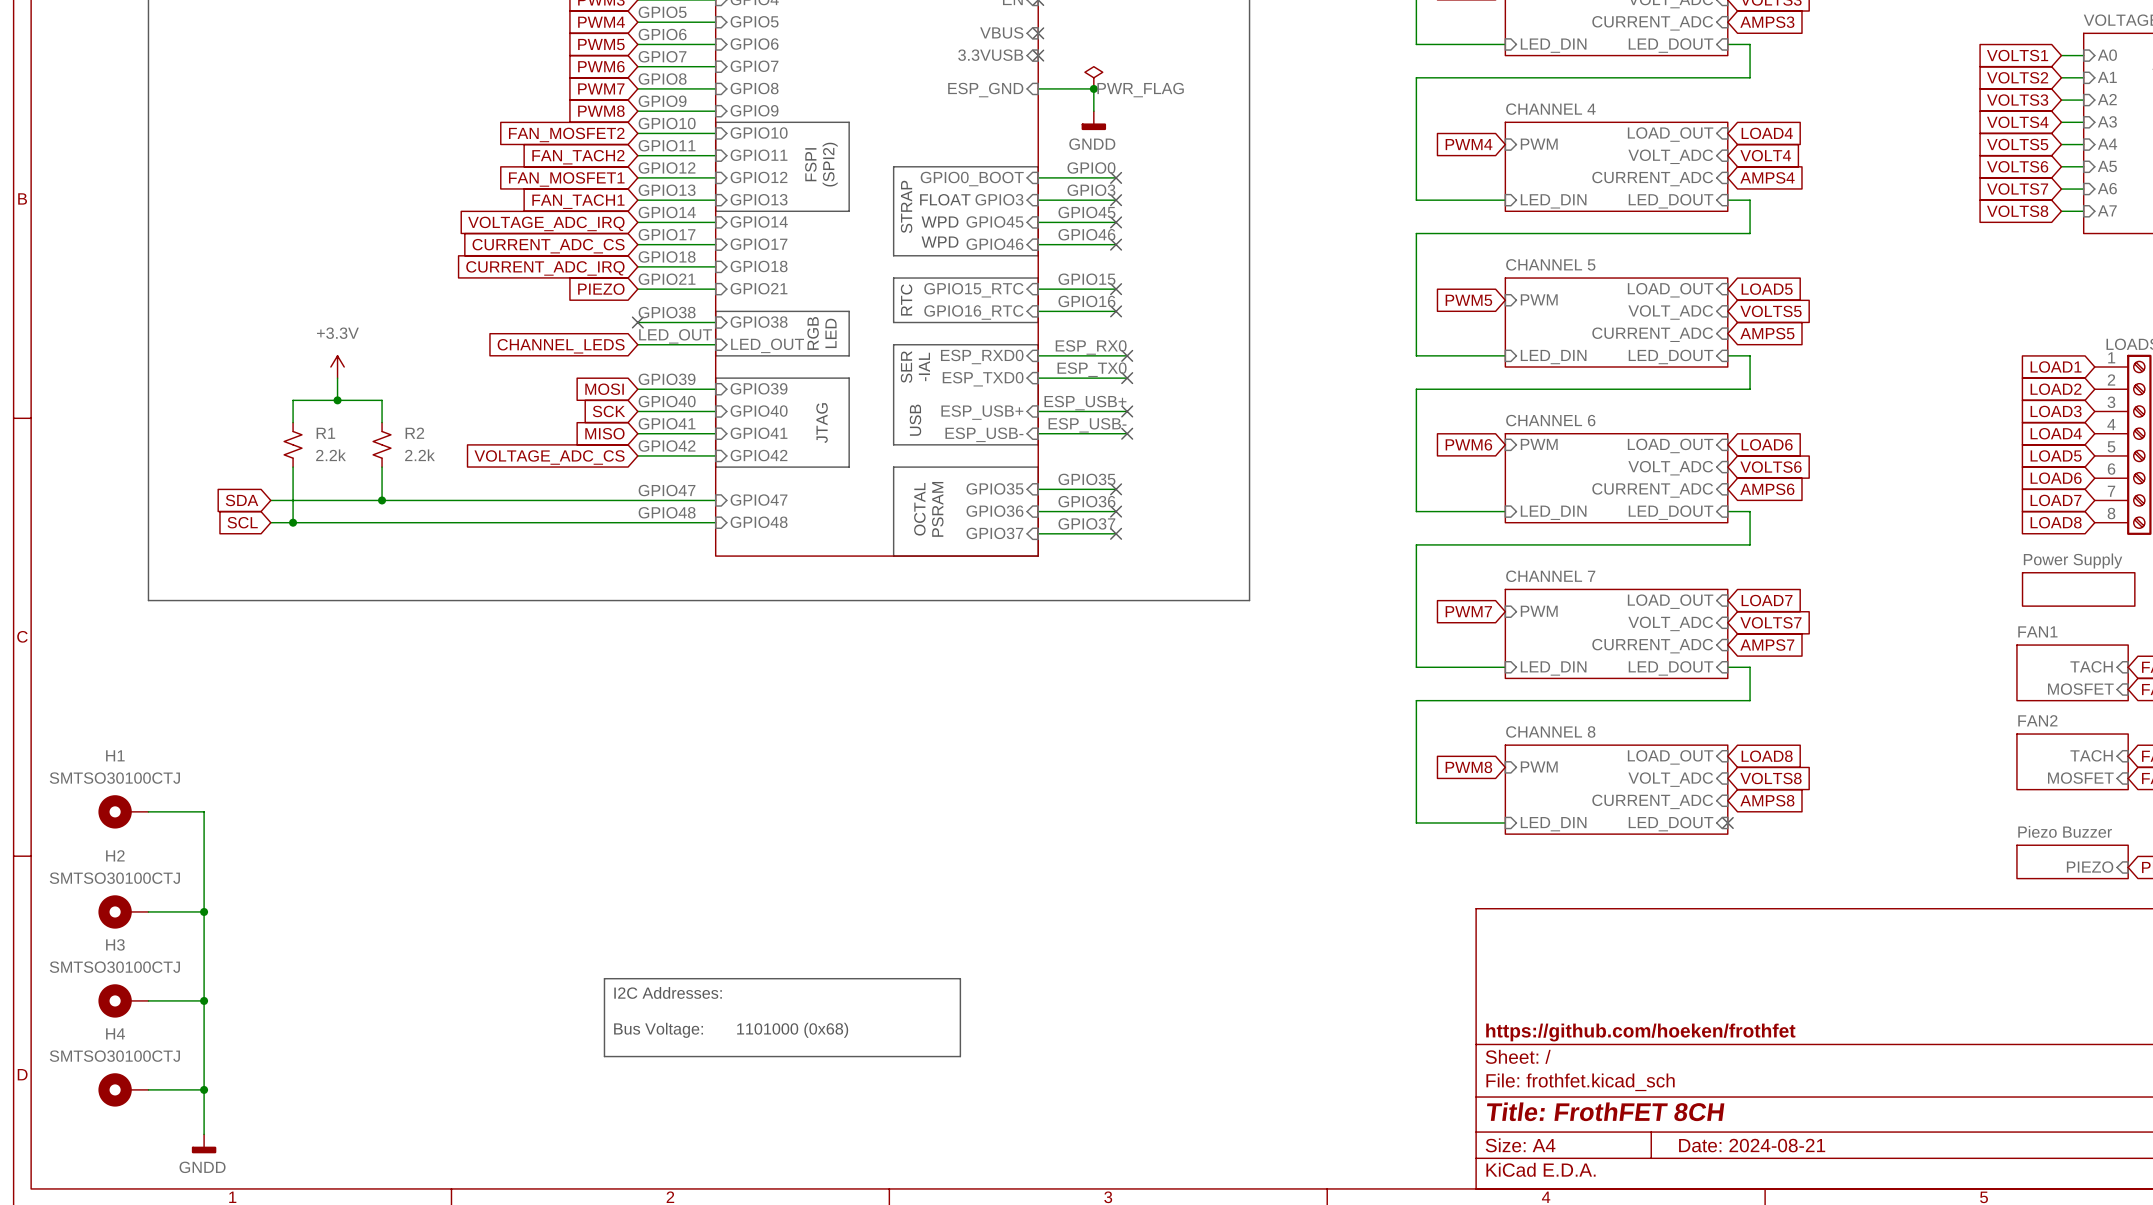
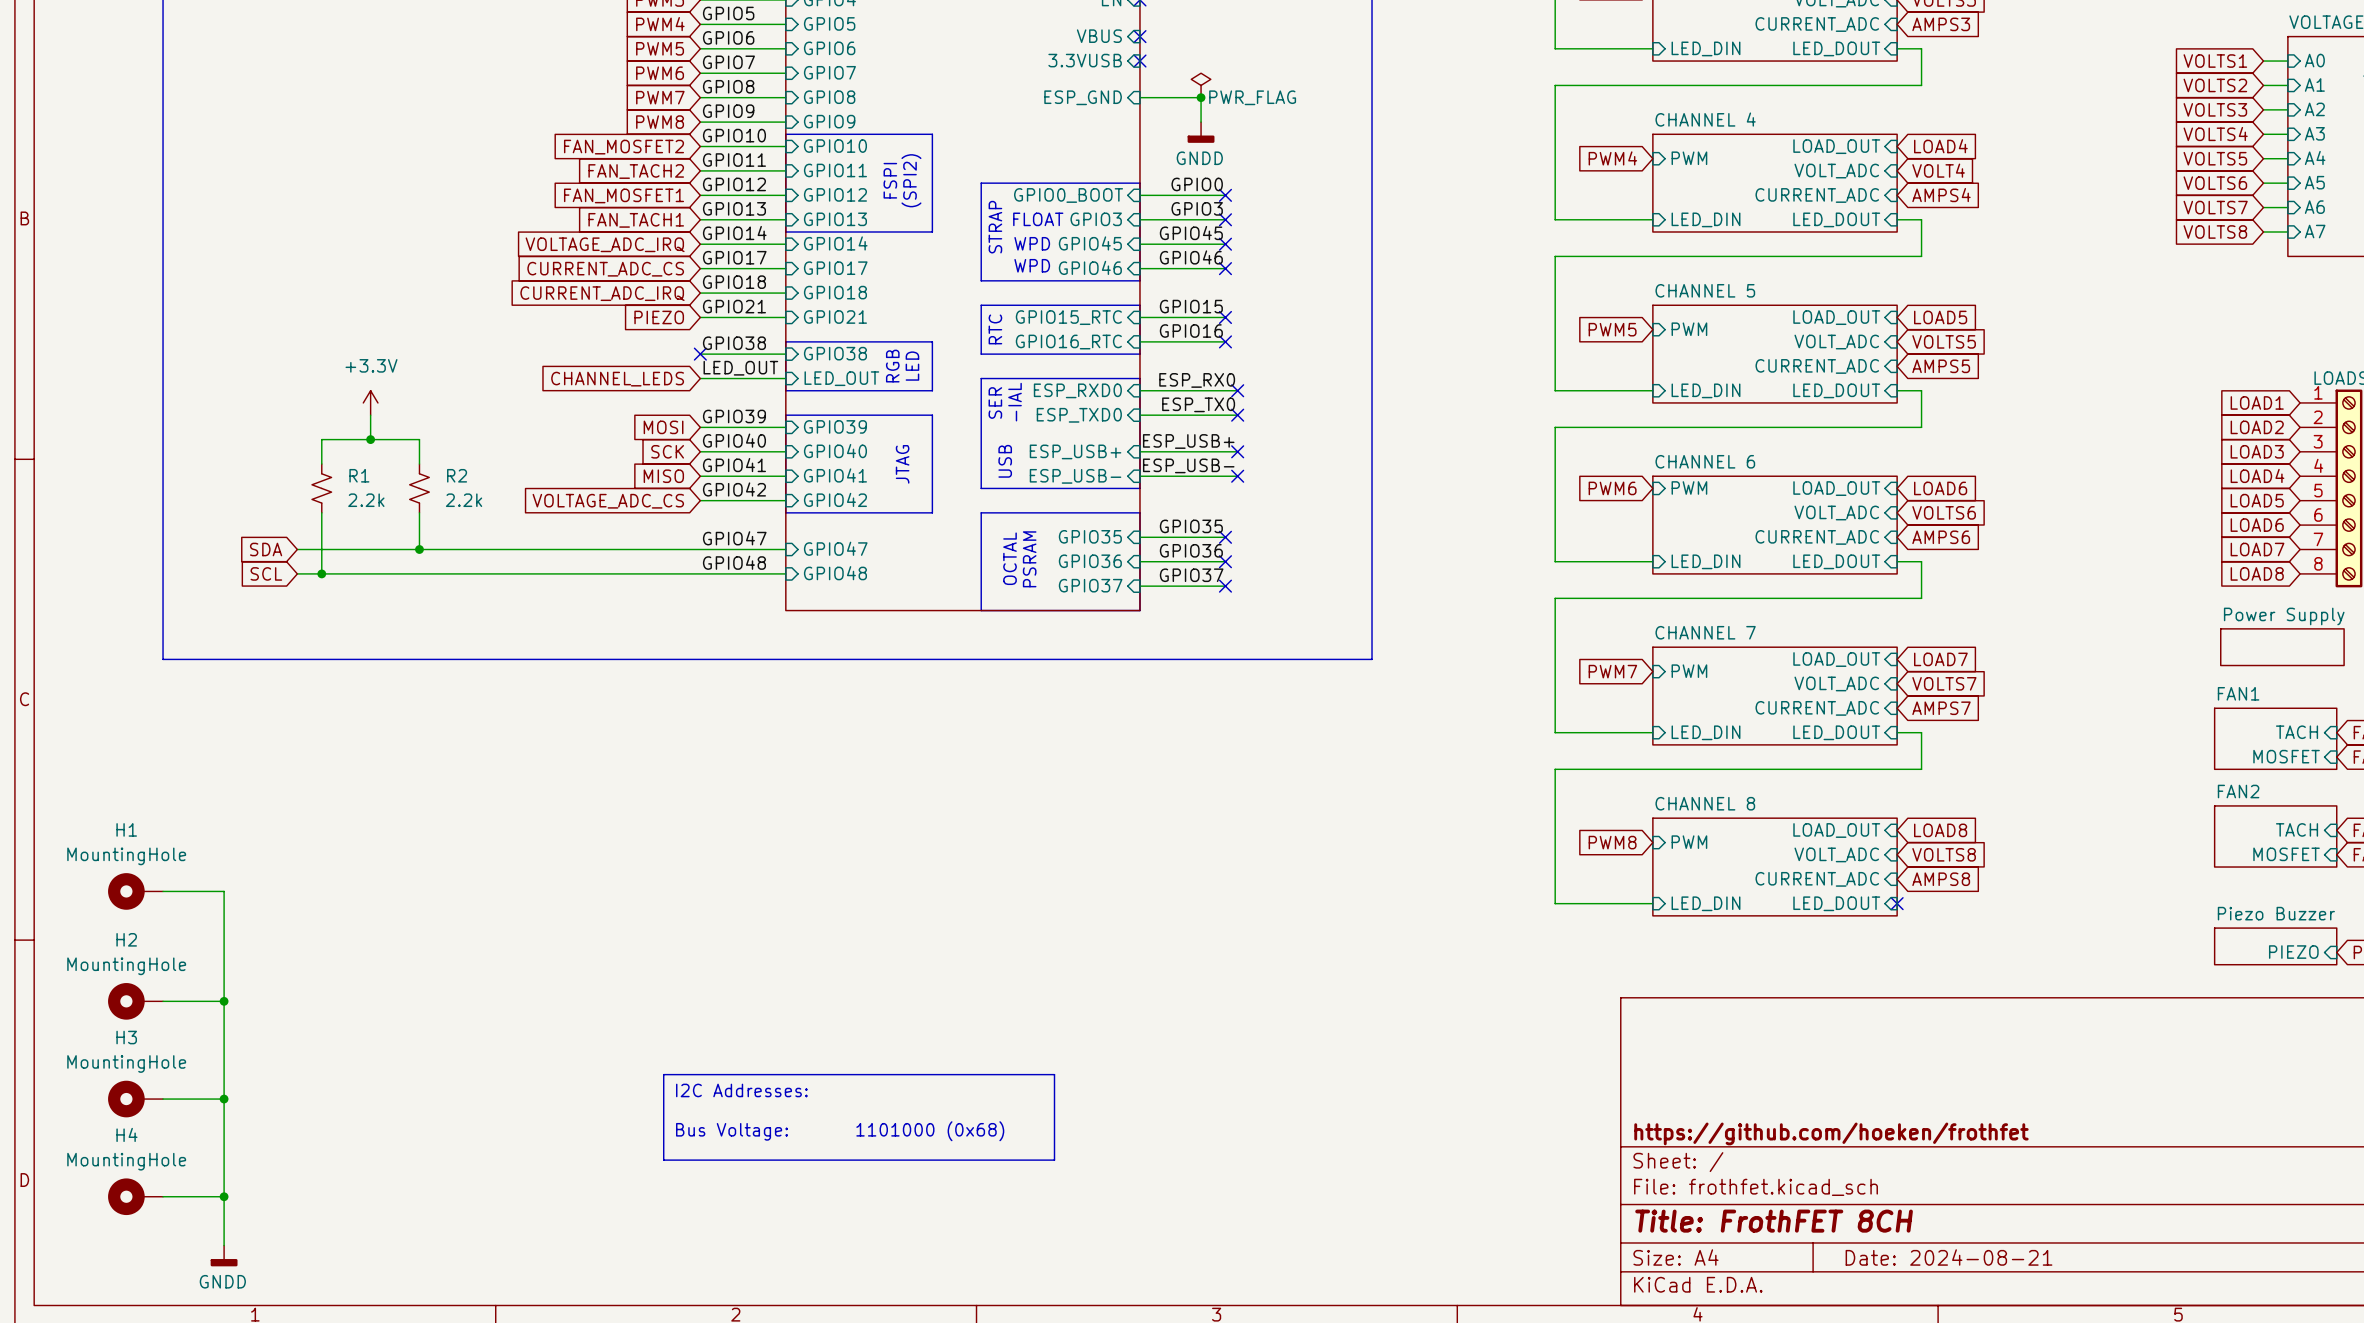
H1 value: SMTSO30100CTJ (114, 778) -> MountingHole (126, 856)
H2 value: SMTSO30100CTJ (114, 878) -> MountingHole (126, 966)
H3 value: SMTSO30100CTJ (114, 967) -> MountingHole (126, 1063)
H4 value: SMTSO30100CTJ (114, 1056) -> MountingHole (126, 1161)

